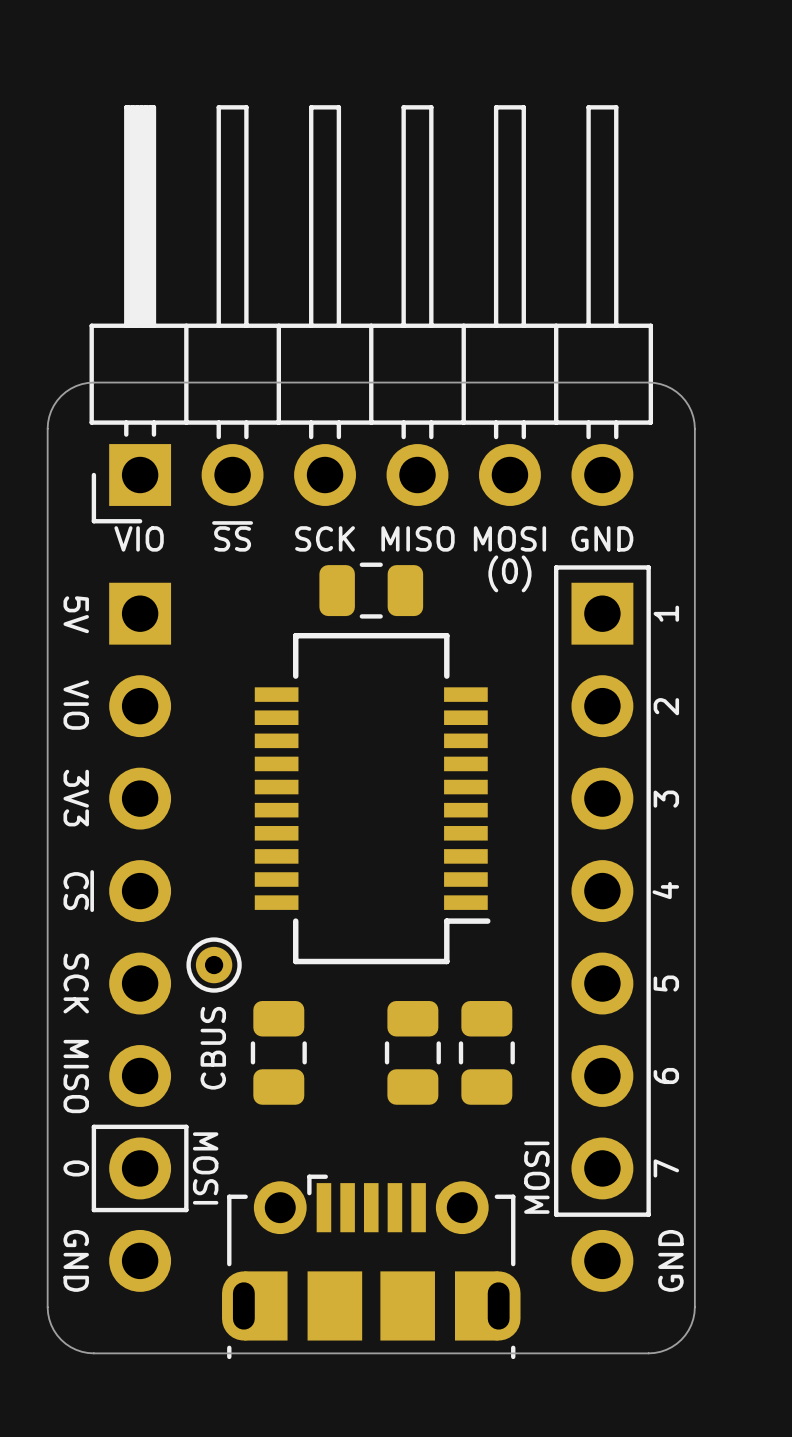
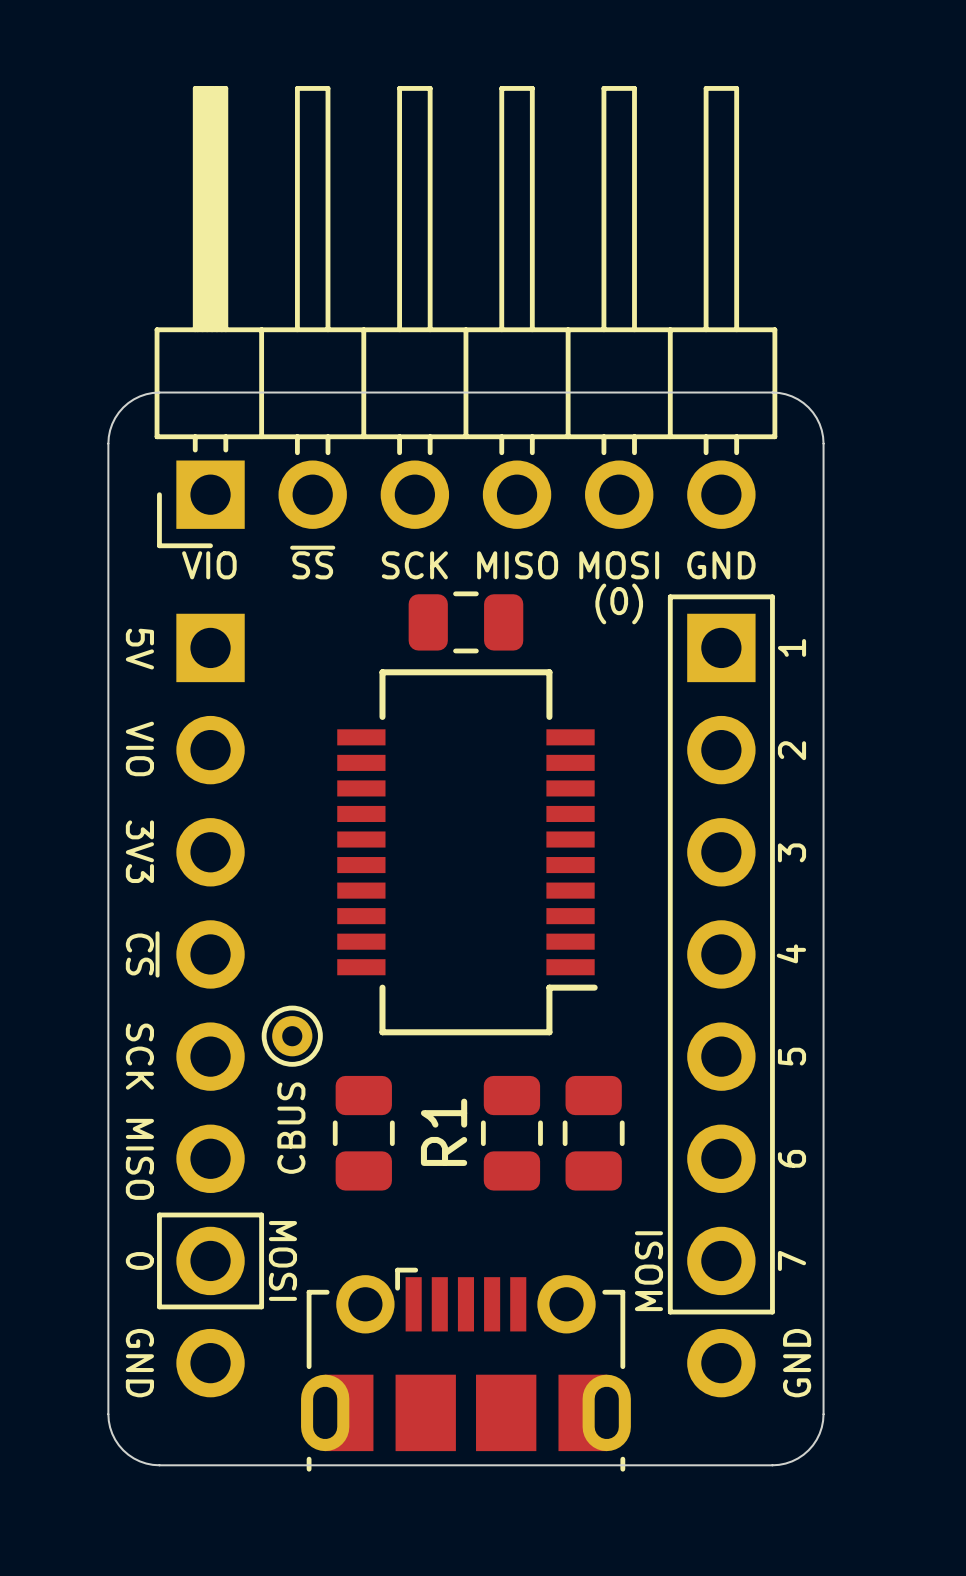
R1 name: none -> R1 (444, 1132)

